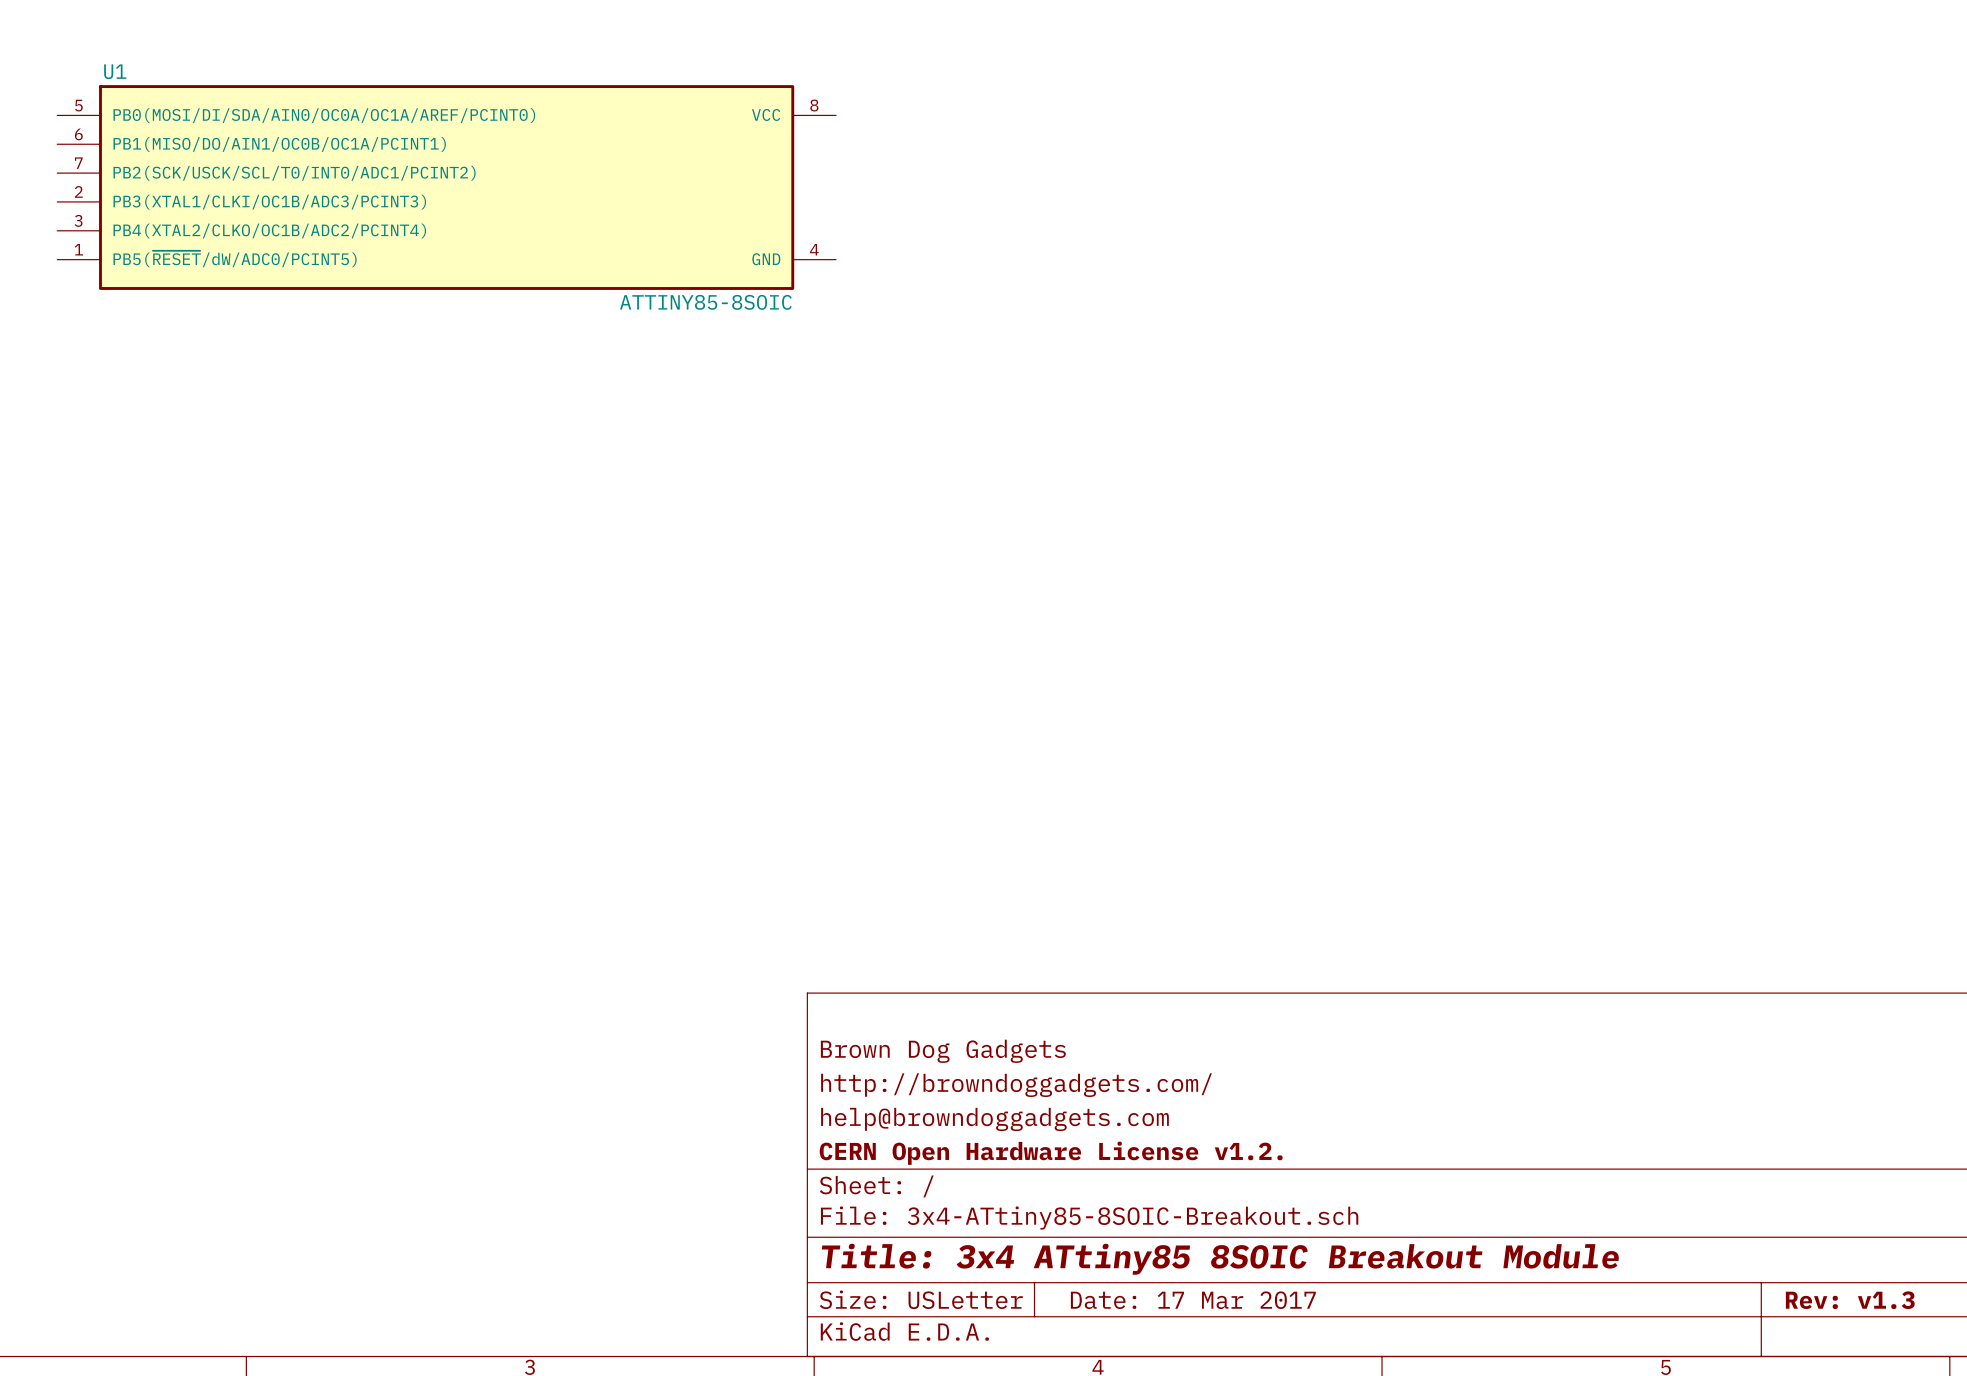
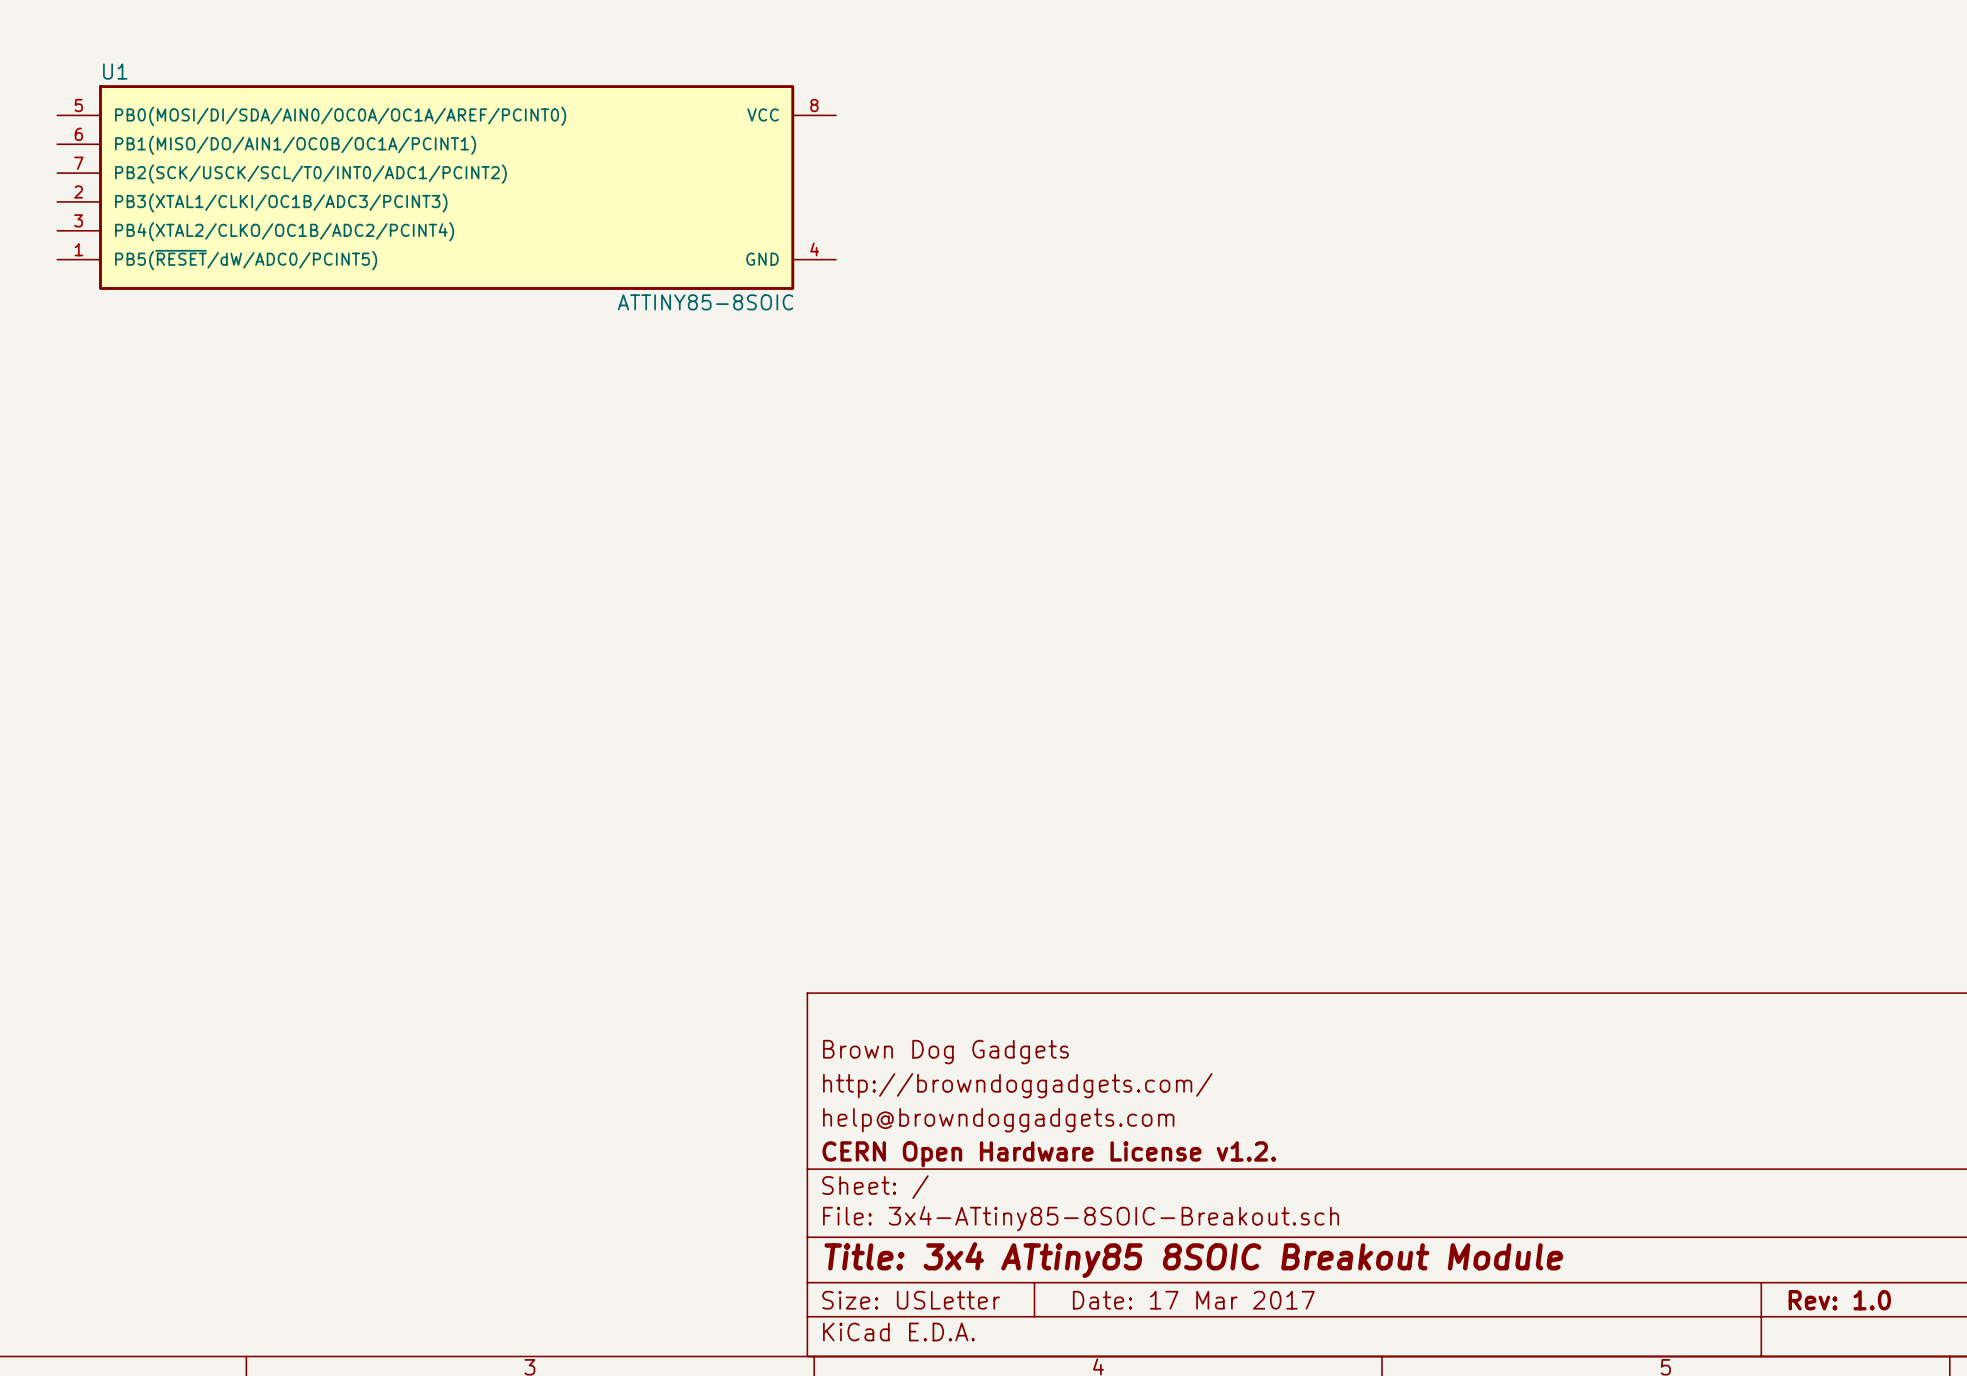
title block: Rev: v1.3 (1850, 1300) -> Rev: 1.0 (1839, 1300)

